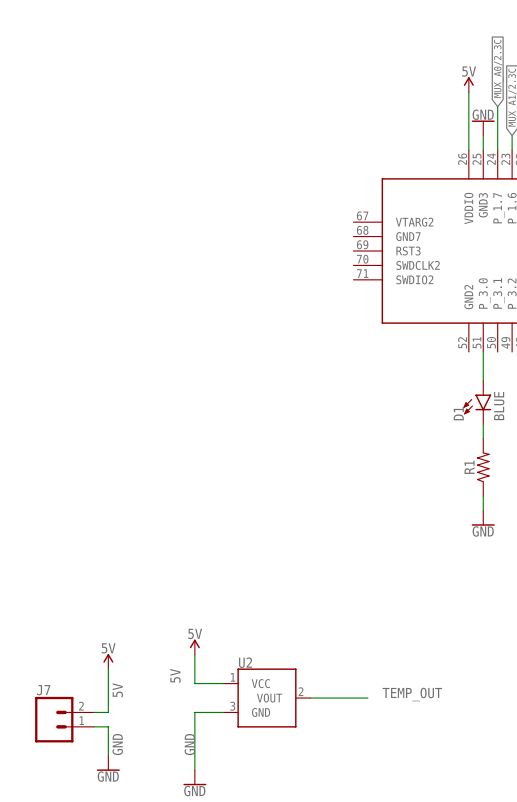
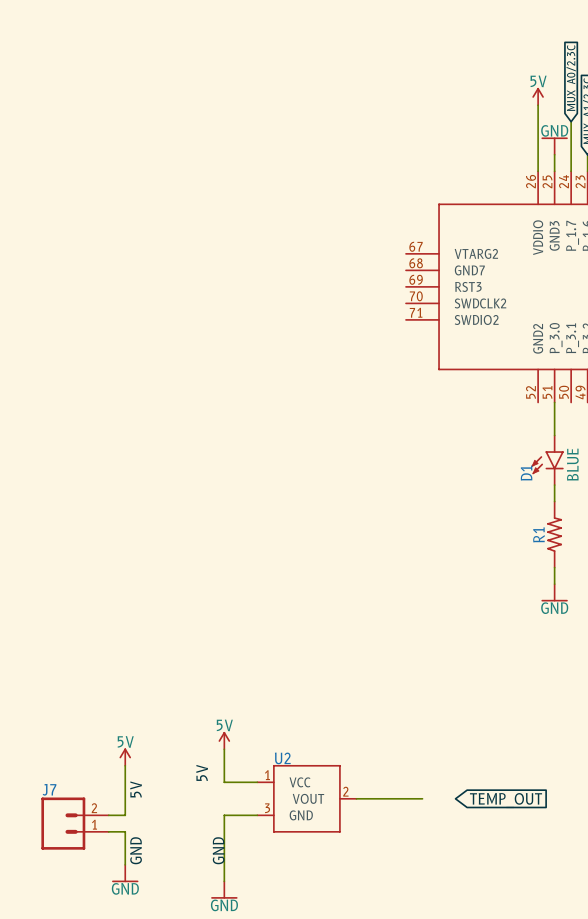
label: TEMP_OUT (412, 694) -> none
global label: none -> TEMP_OUT (506, 800)

